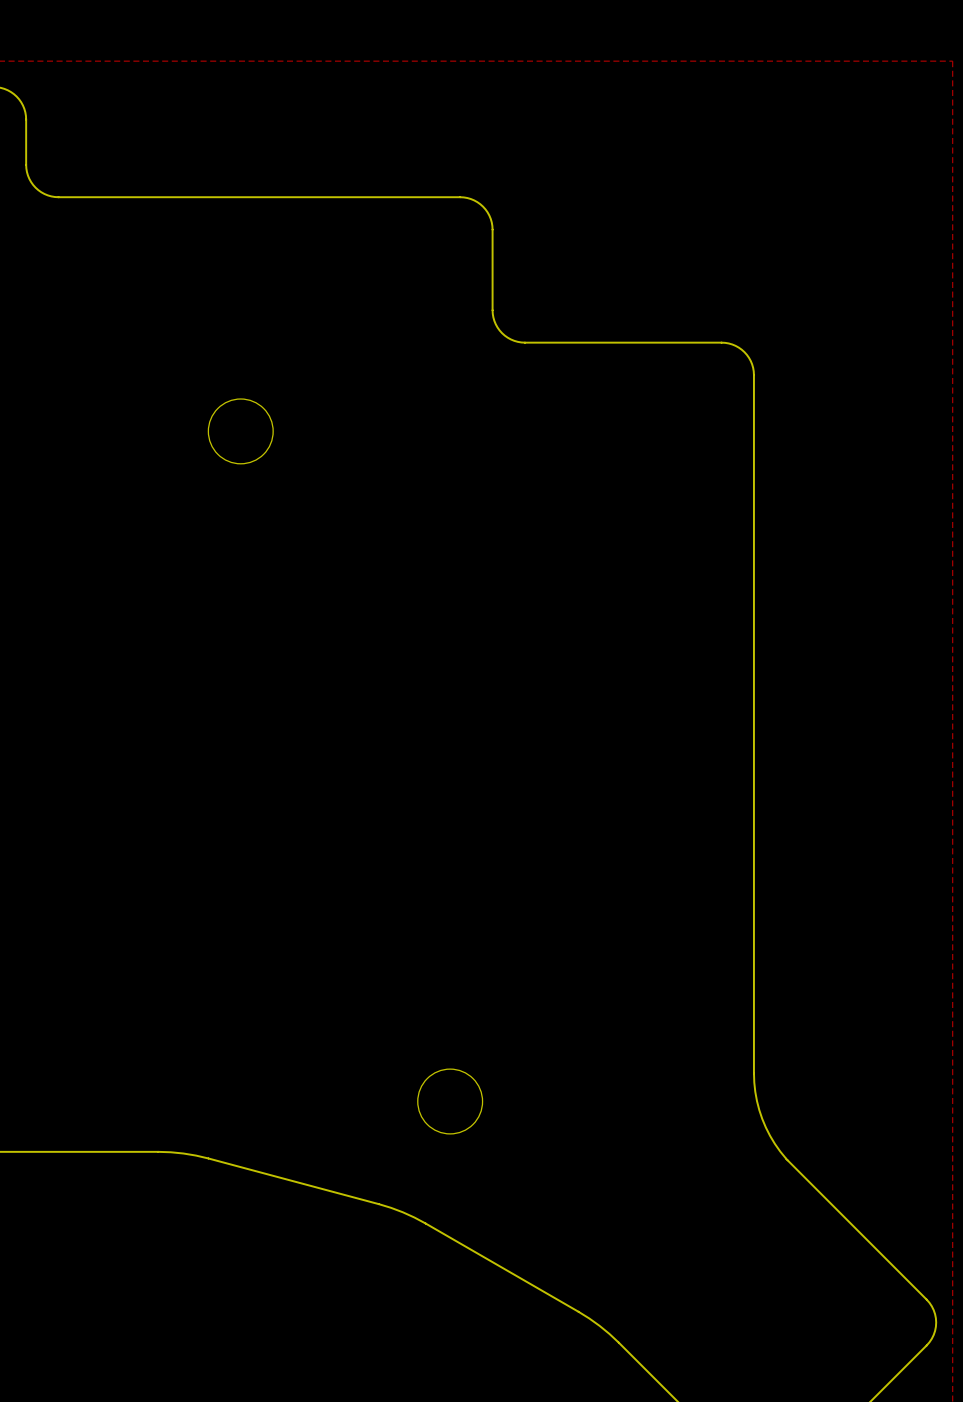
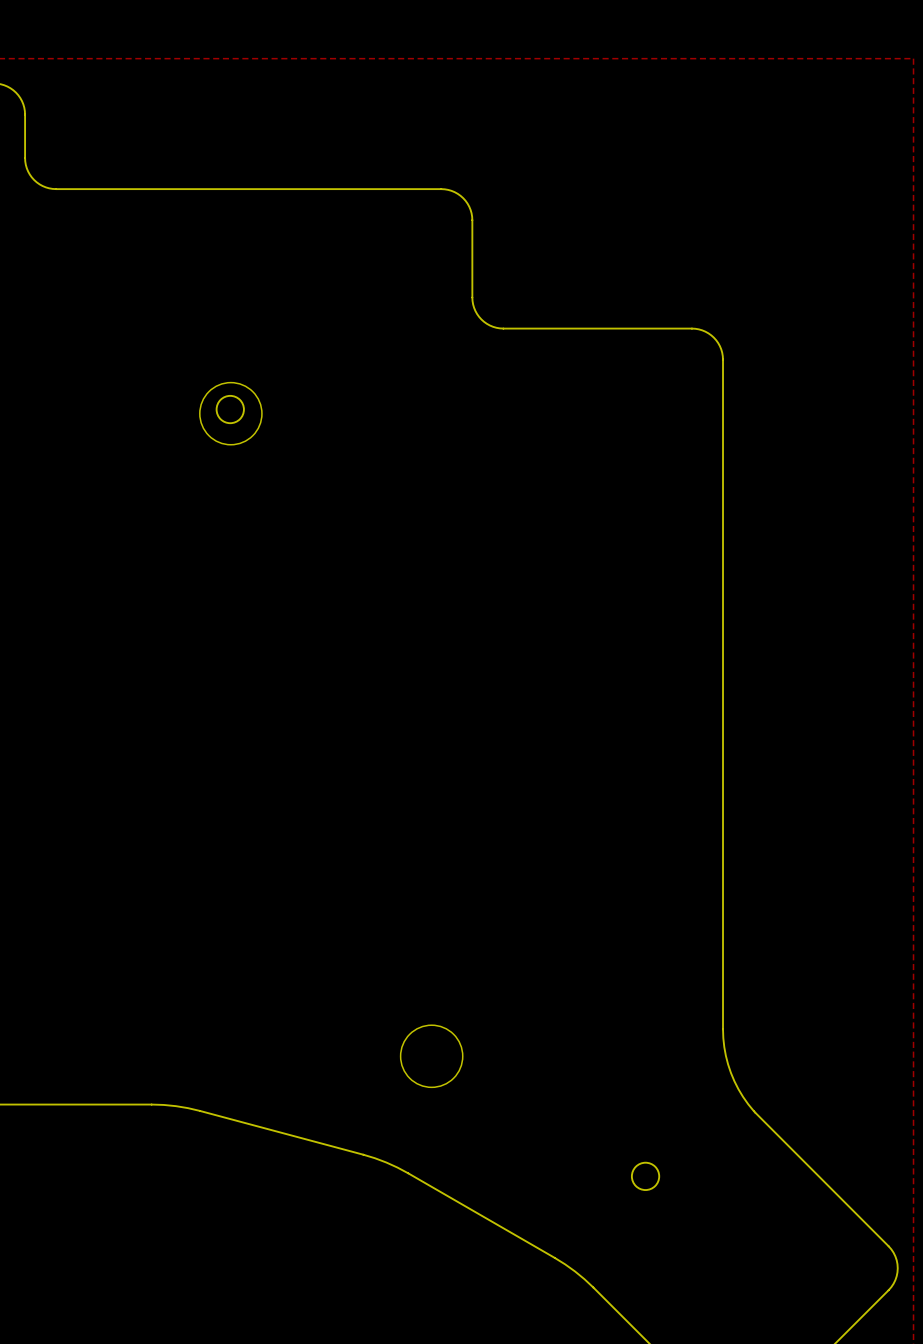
round board edge: none -> [215, 394, 245, 425]
round board edge: none -> [630, 1161, 661, 1191]

